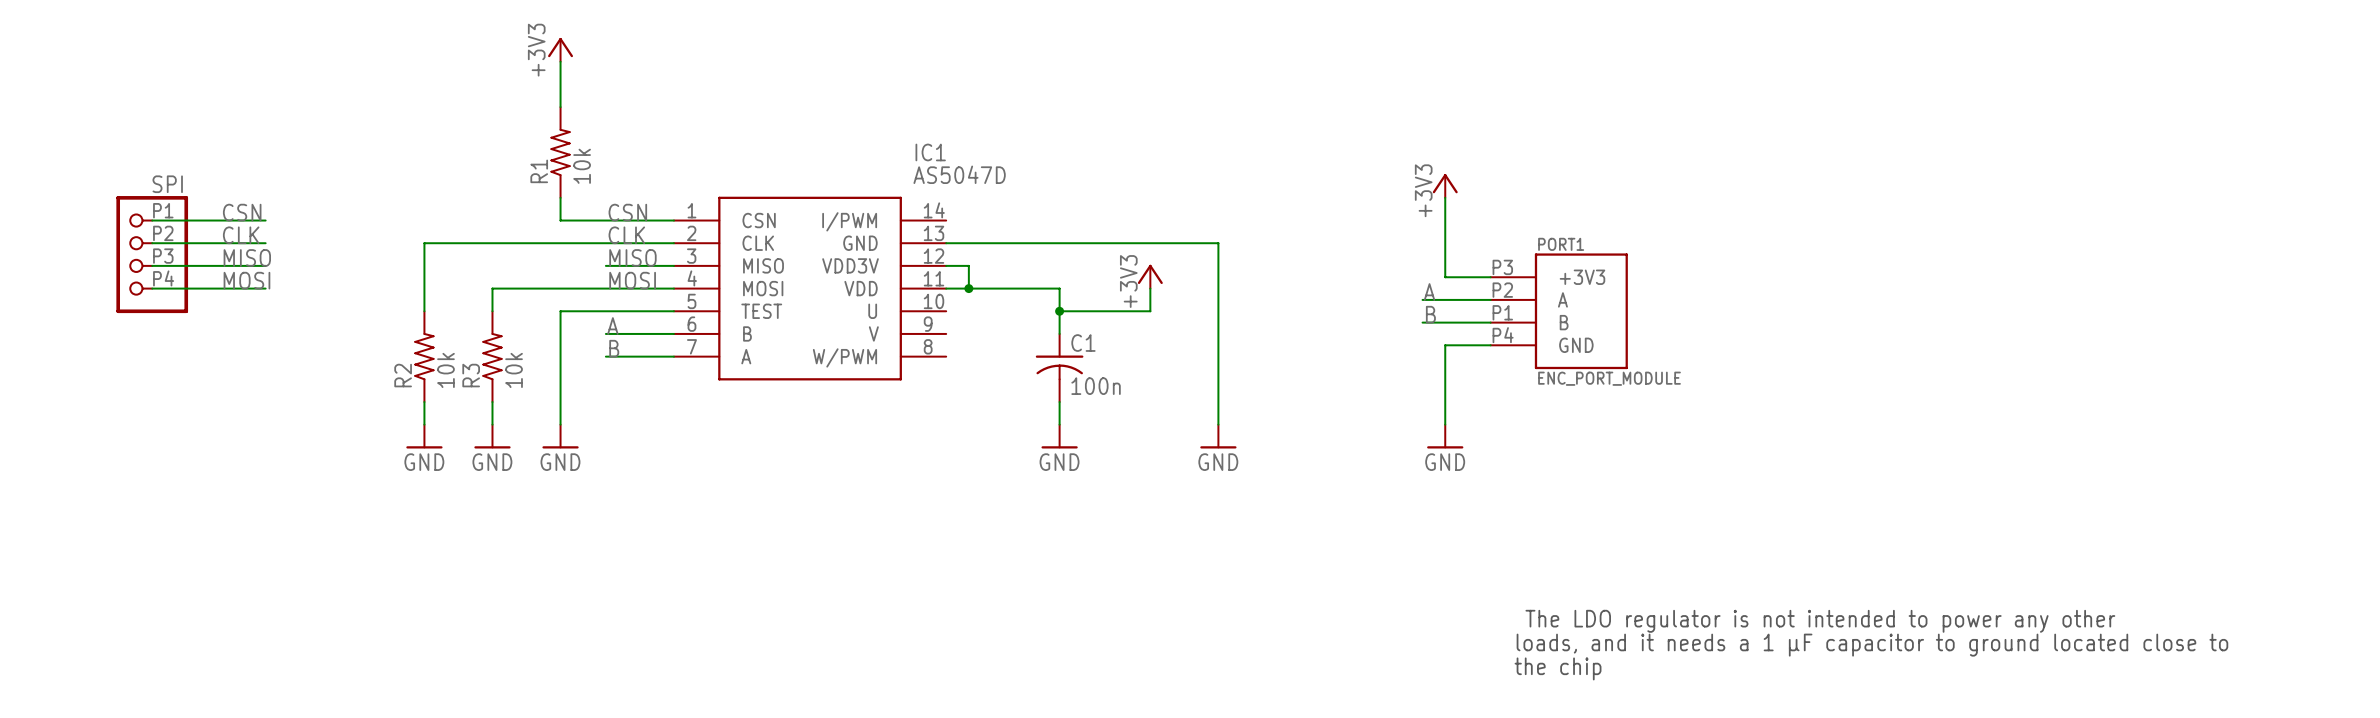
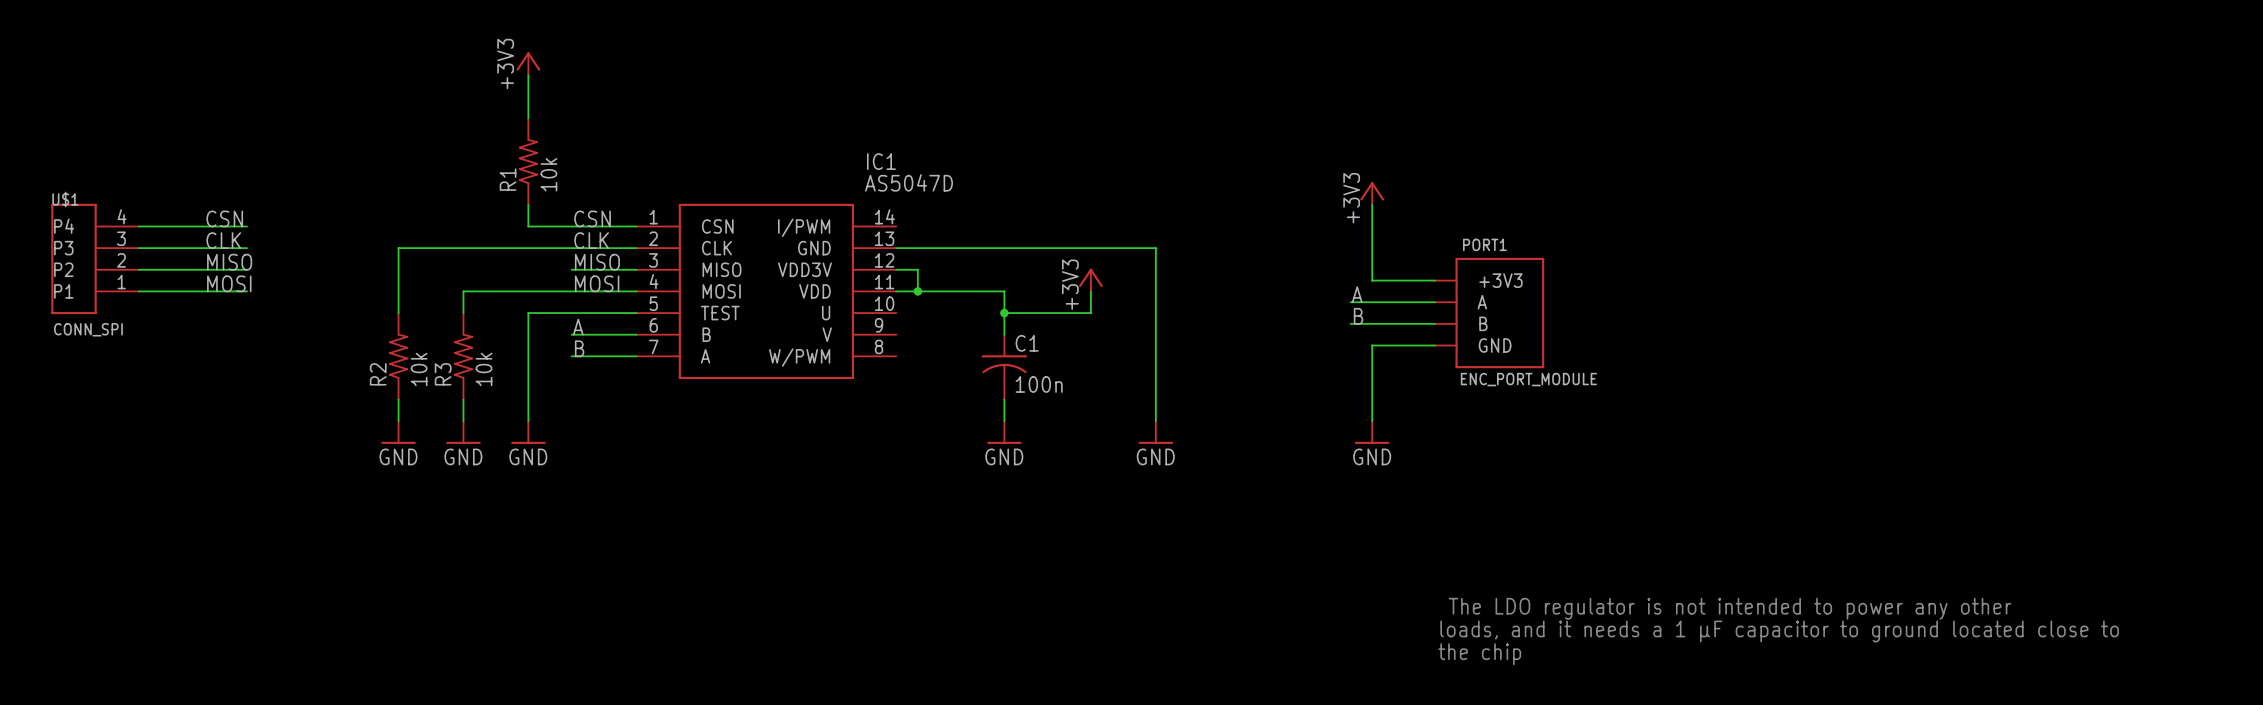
PORT1 symbol: [1490, 253, 1628, 370] -> [1434, 257, 1545, 369]
U$1: none -> CONN_SPI (95, 258)
SPI: (152, 254) -> none

